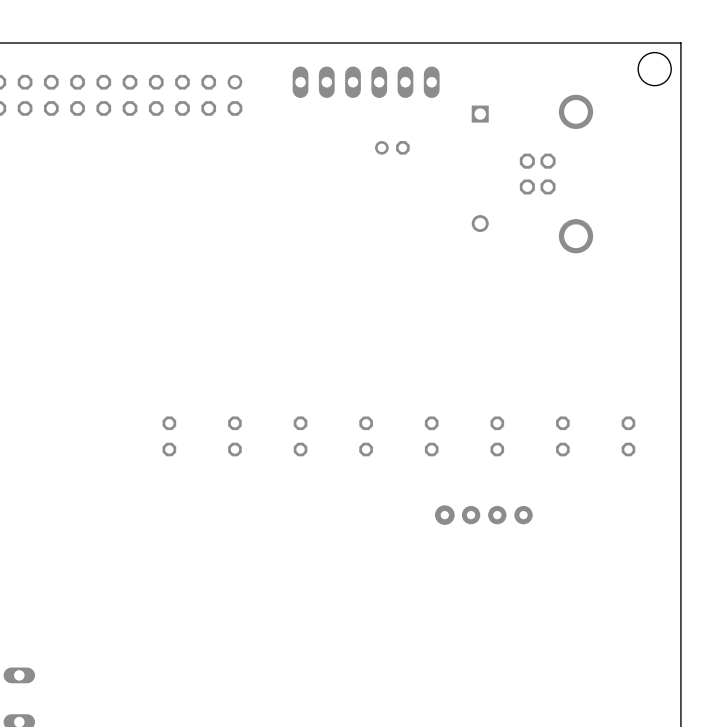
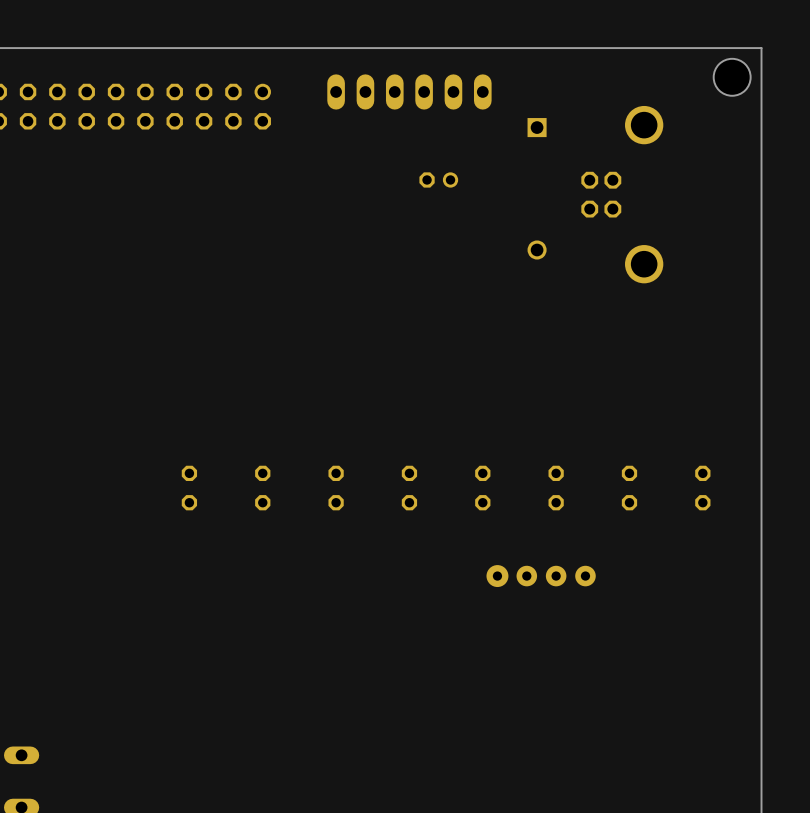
part rotation: 0° (392, 147) -> 180° (438, 179)

